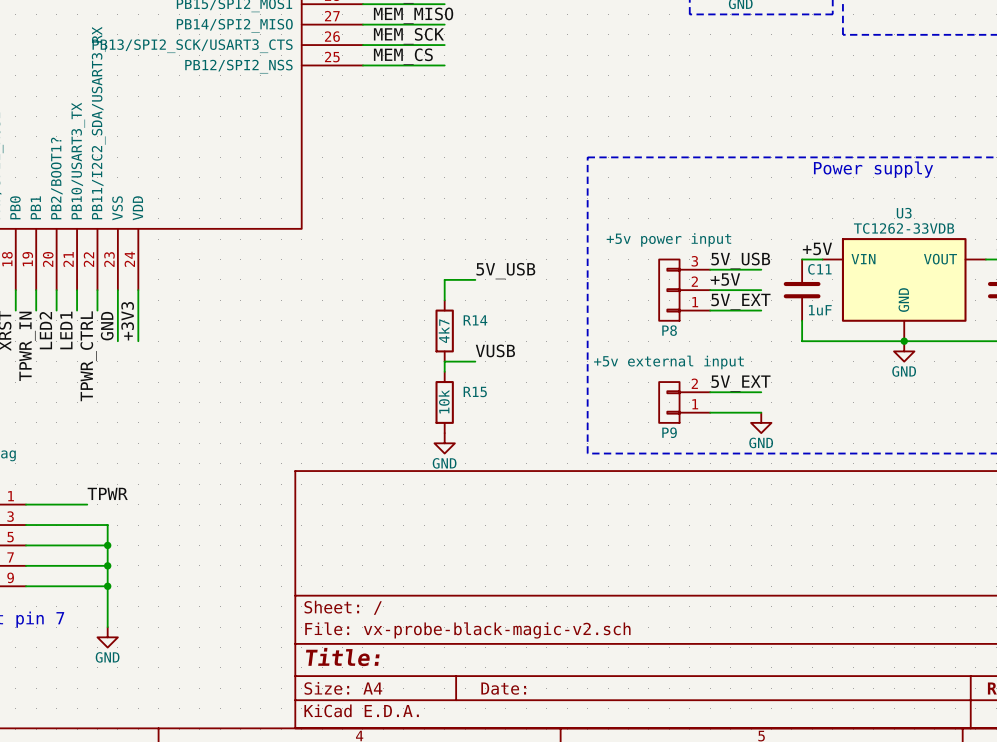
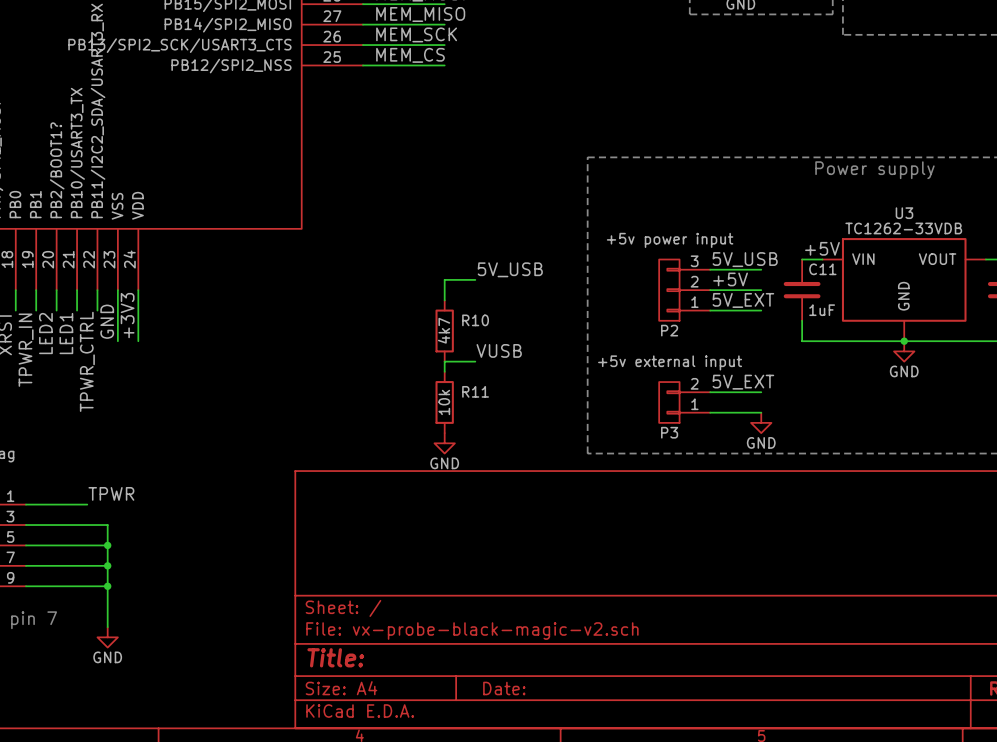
R14 name: R14 (475, 320) -> R10 (475, 320)
P8 name: P8 (669, 330) -> P2 (669, 330)
R15 name: R15 (475, 391) -> R11 (475, 391)
P9 name: P9 (669, 432) -> P3 (669, 432)

